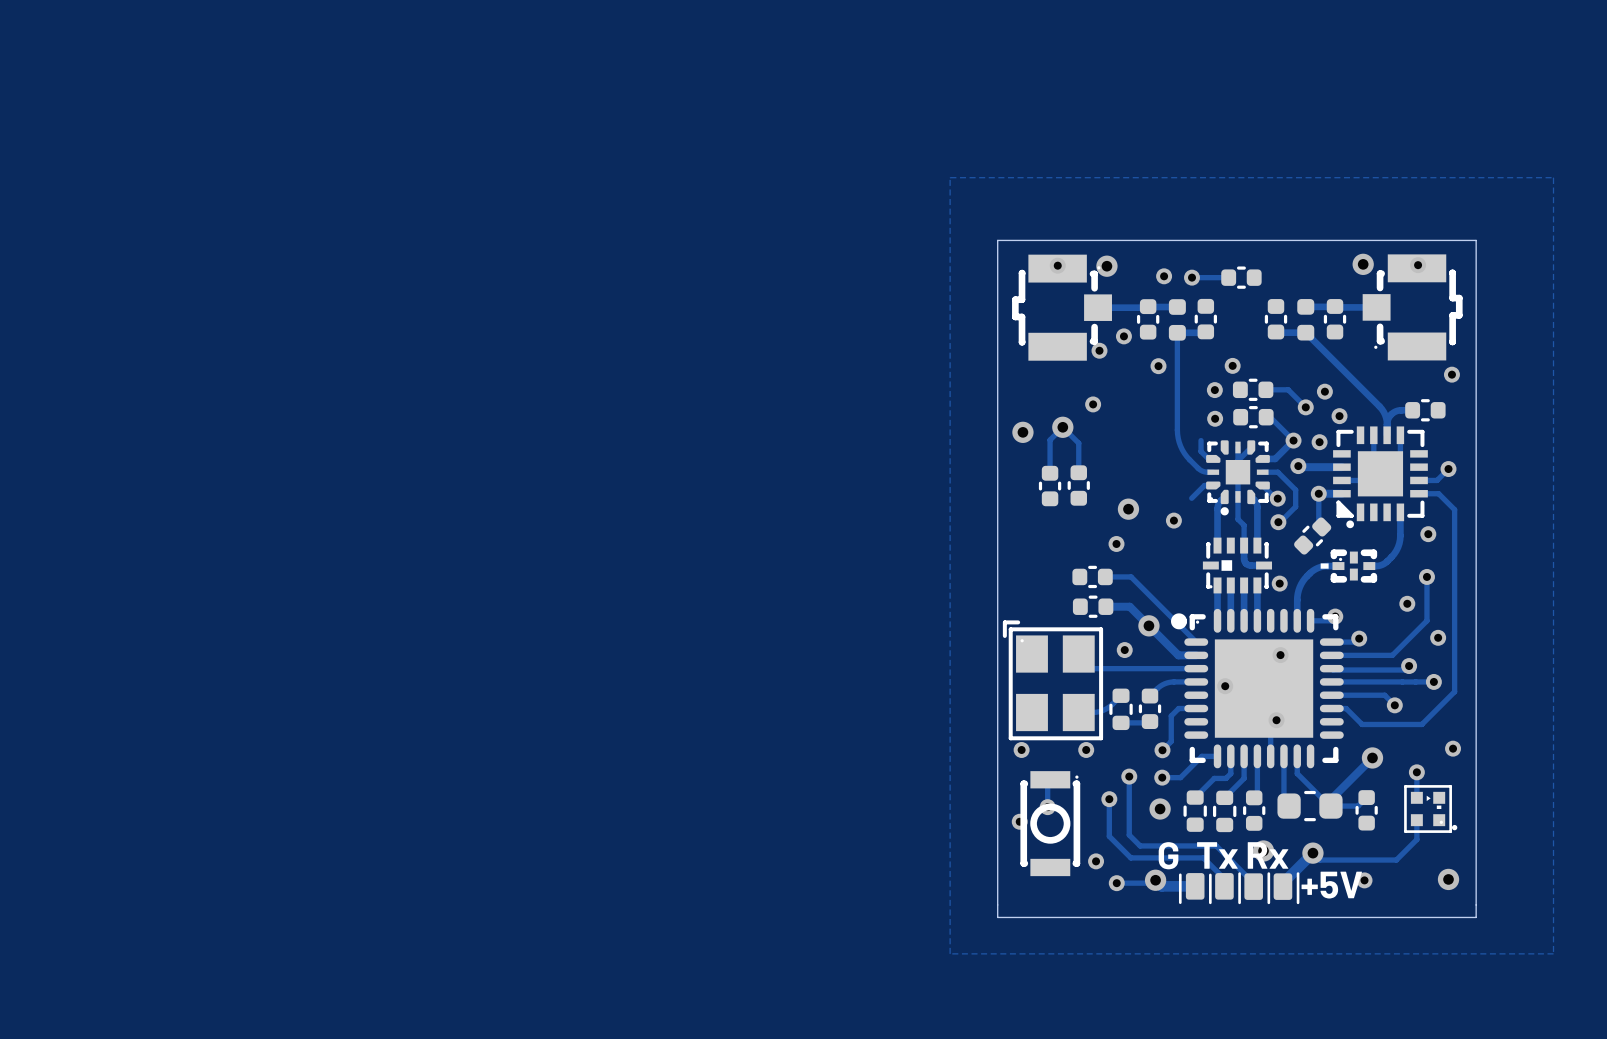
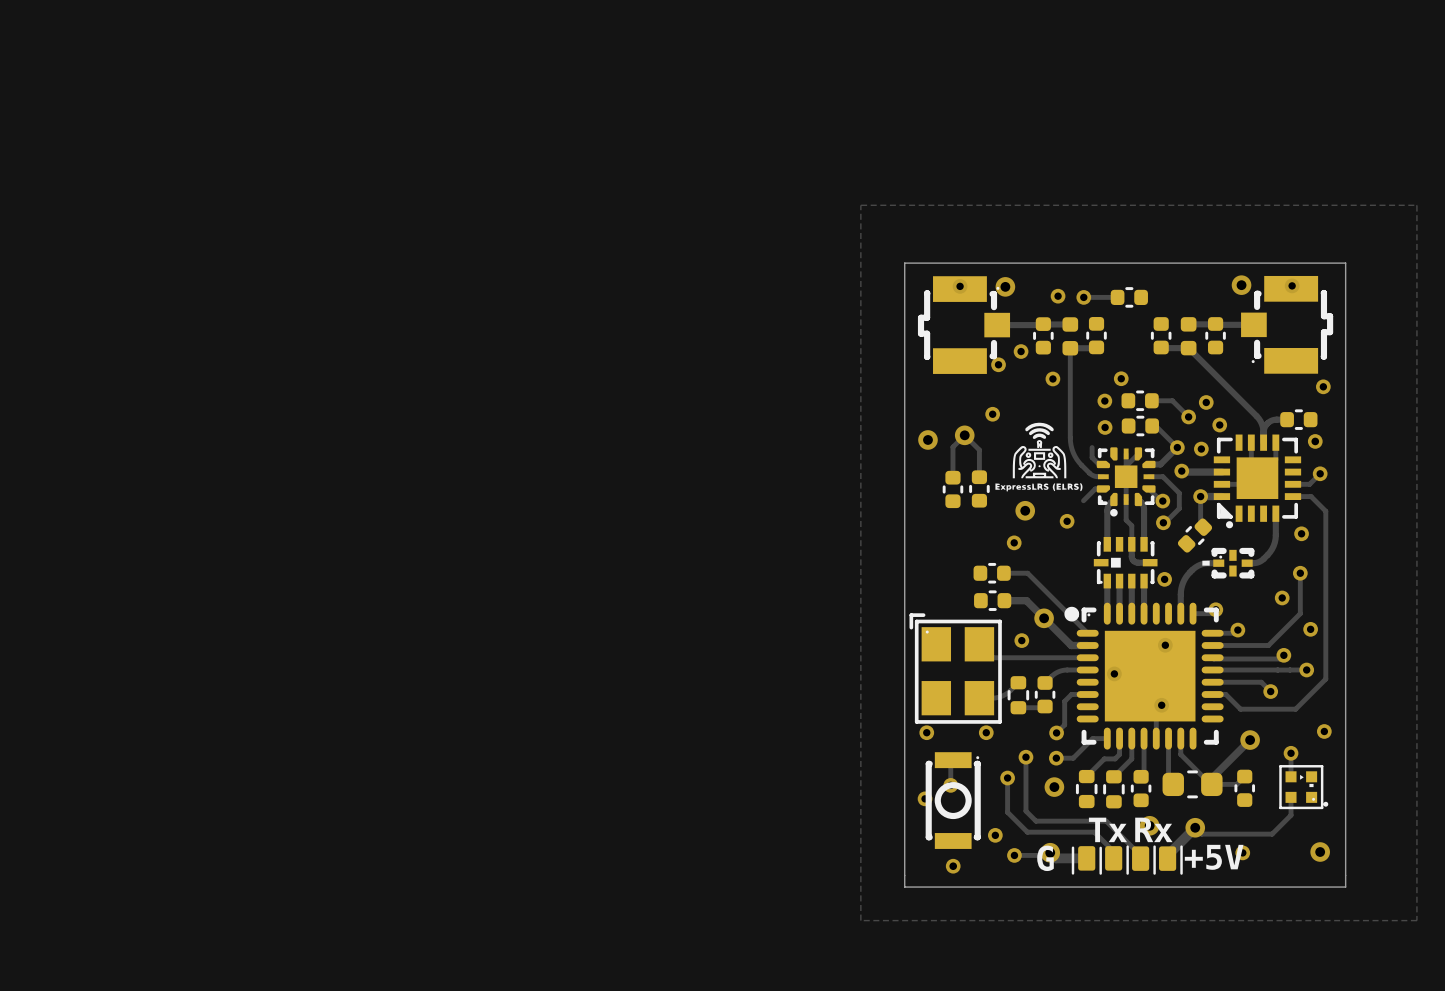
drawing: none -> [995, 422, 1083, 492]
via: none -> (1315, 441)
text position: G (1168, 855) -> G (1045, 858)
via: none -> (953, 866)

